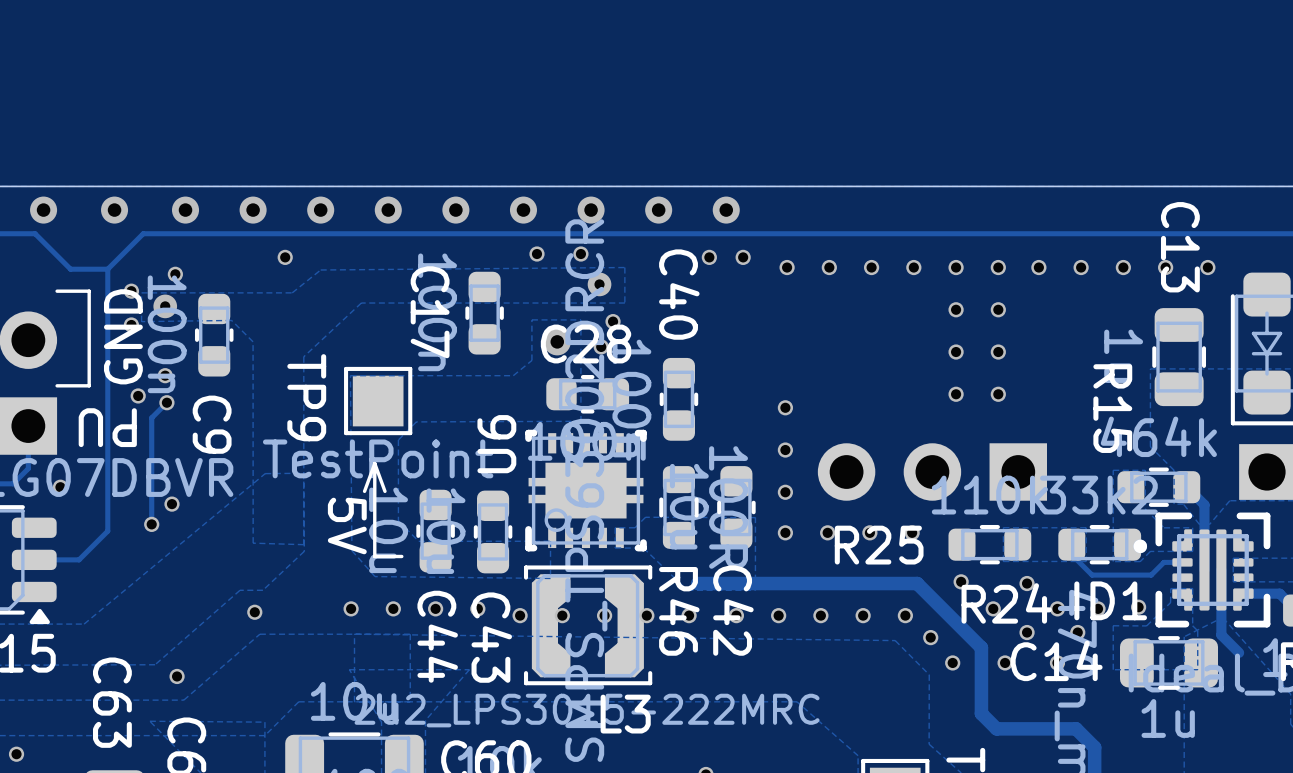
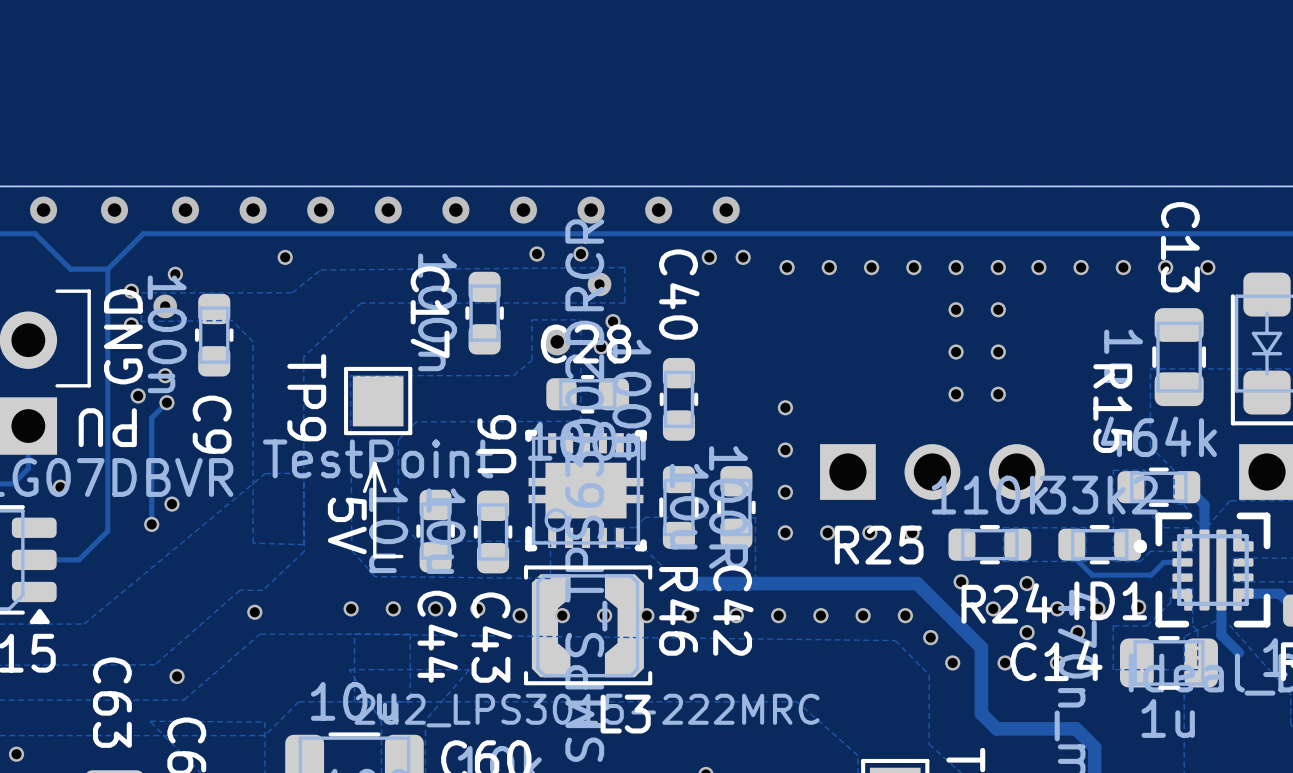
part footprint: [817, 443, 1047, 501] -> [820, 444, 1045, 500]

